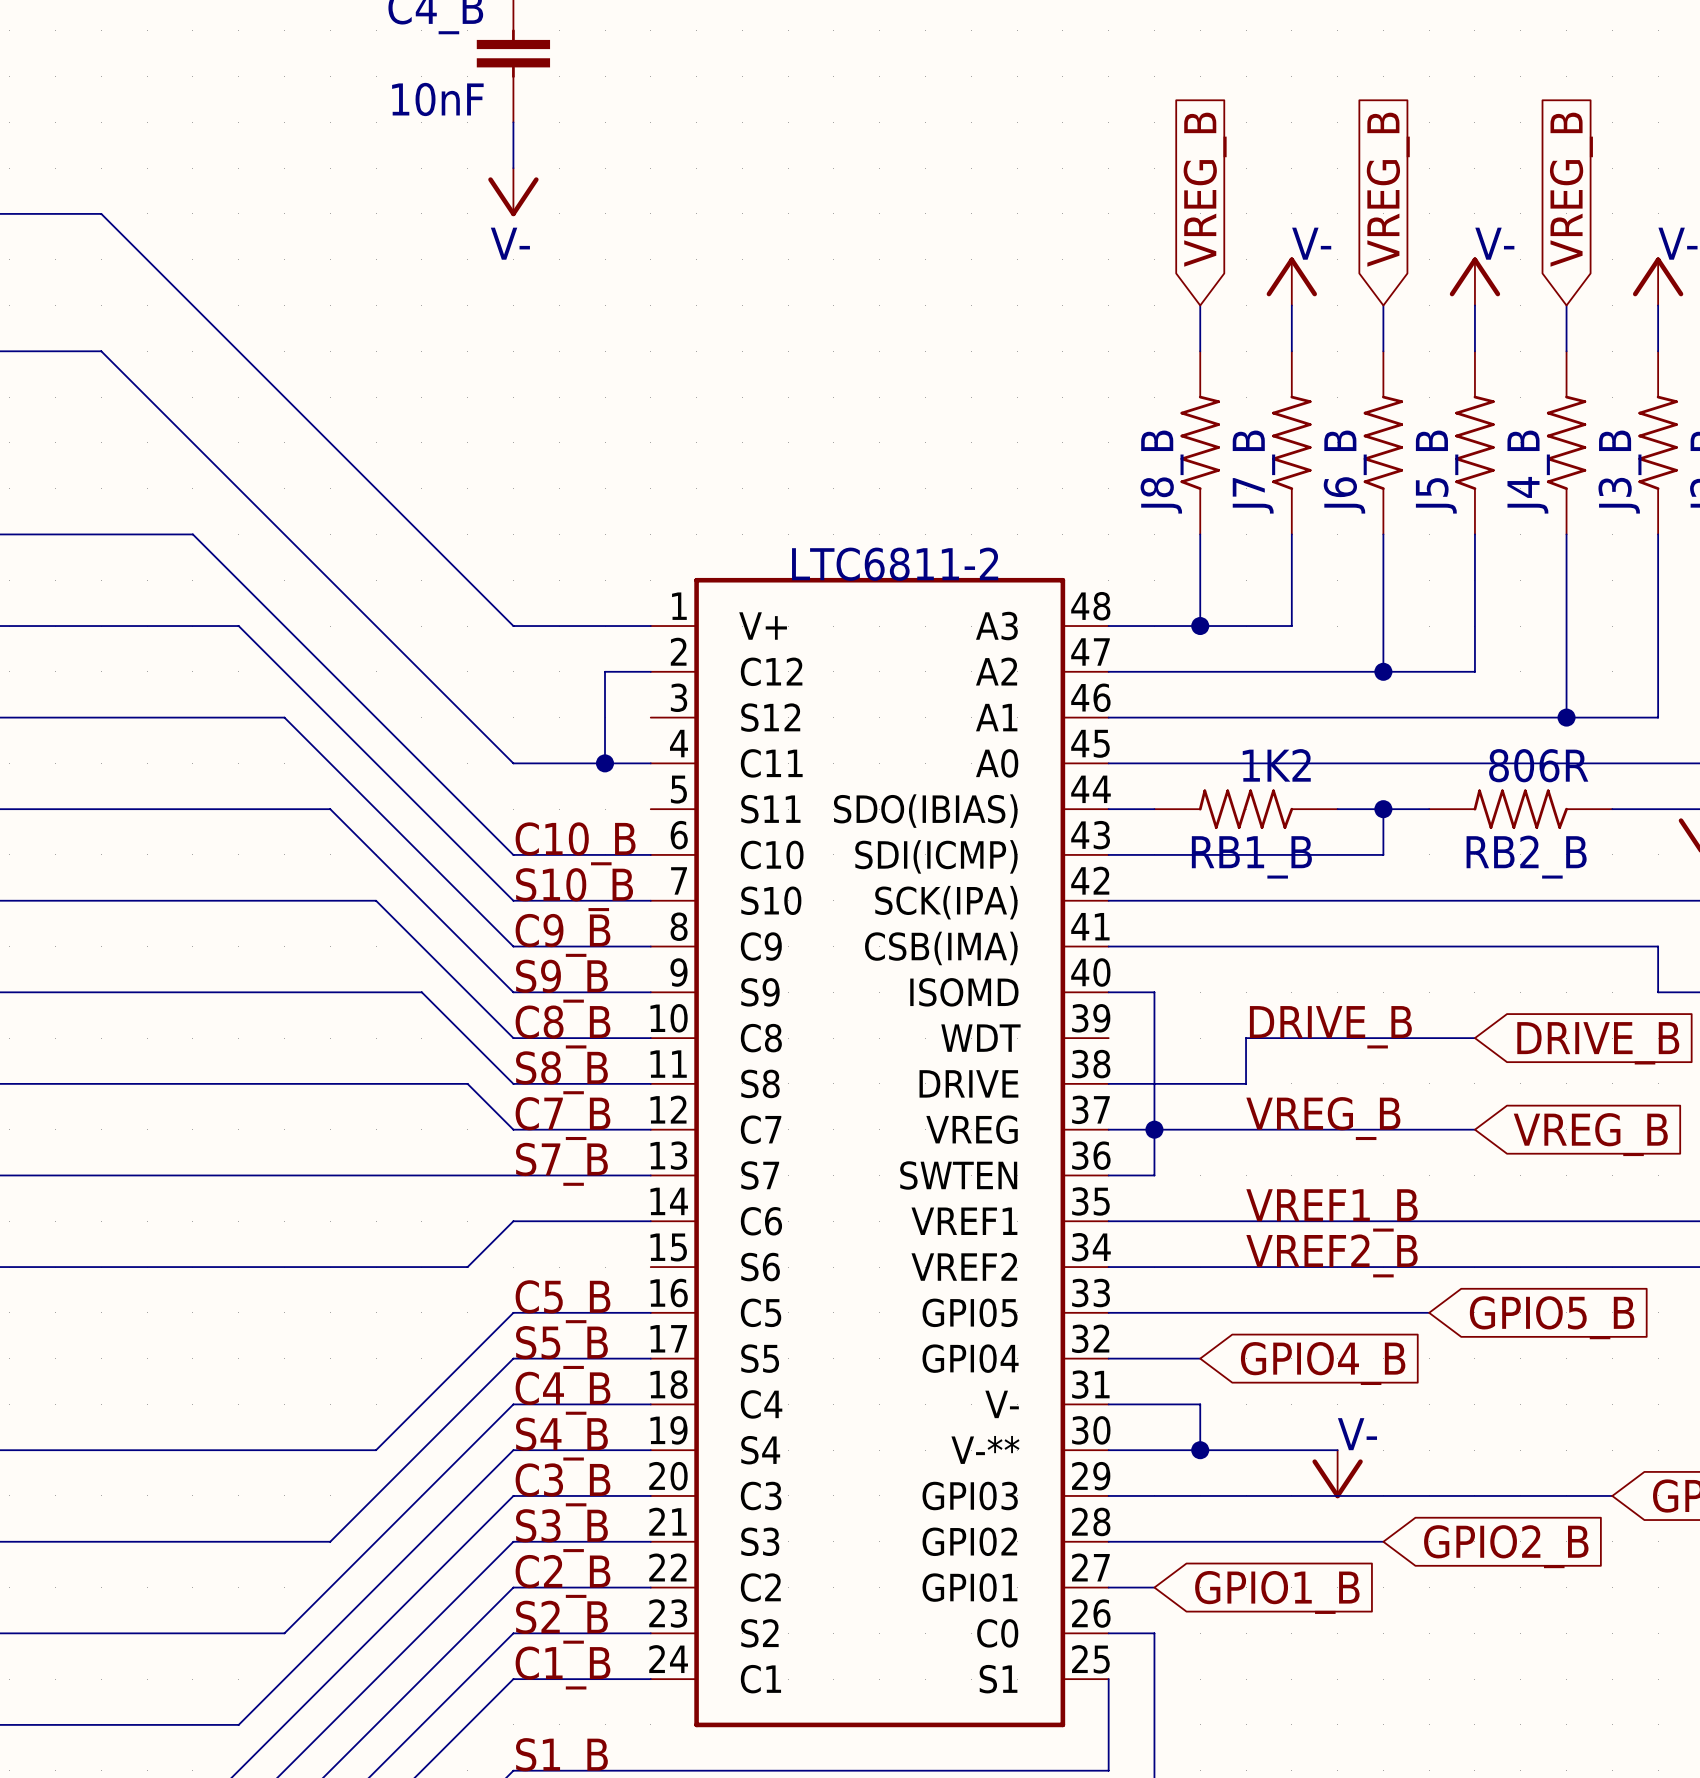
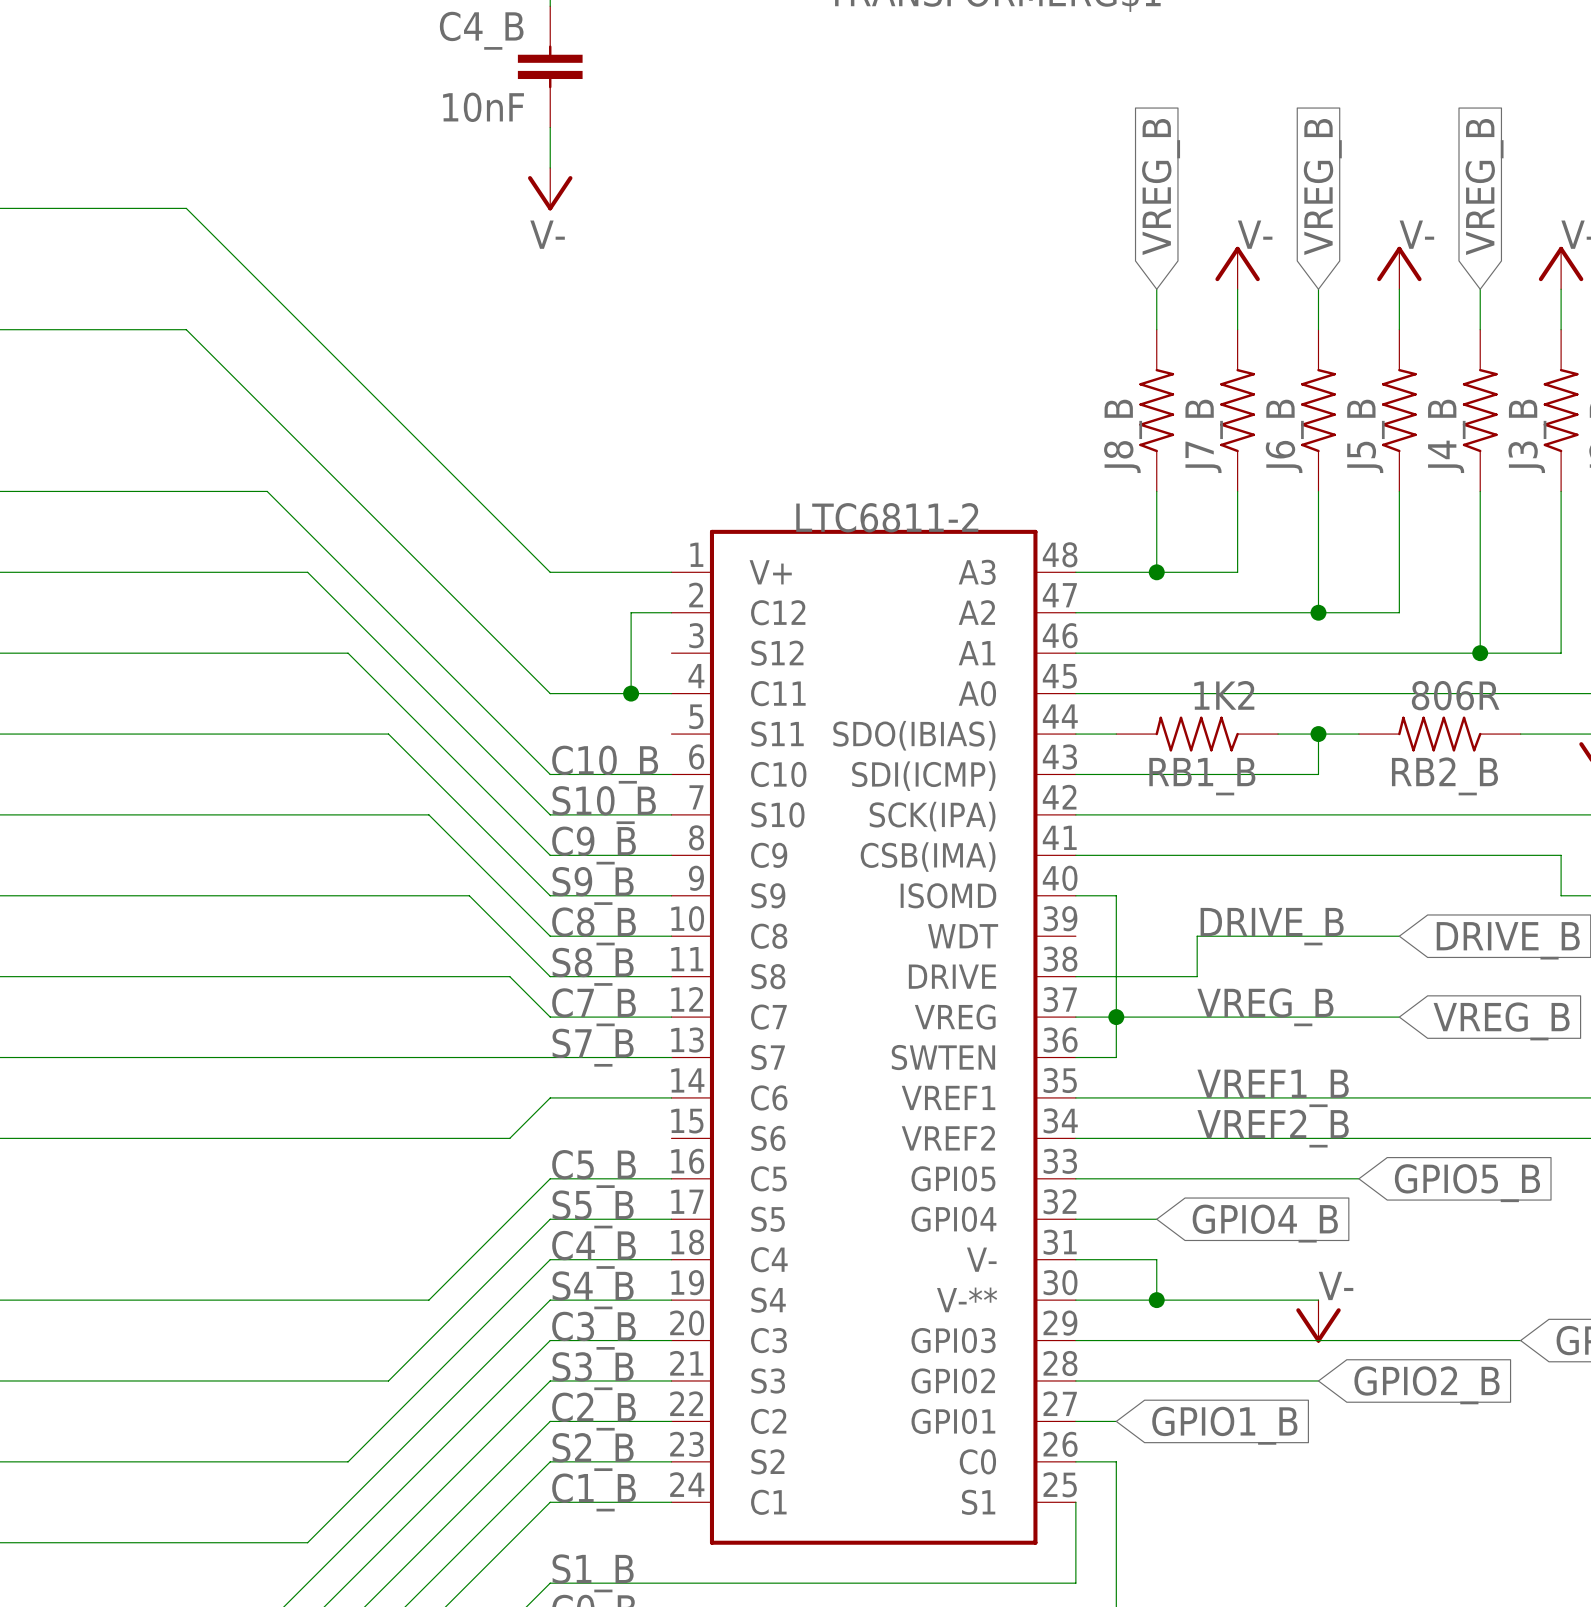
wire: none -> (1278, 1300) (1318, 1300)
power symbol position: V- (1337, 1474) -> V- (1318, 1321)

